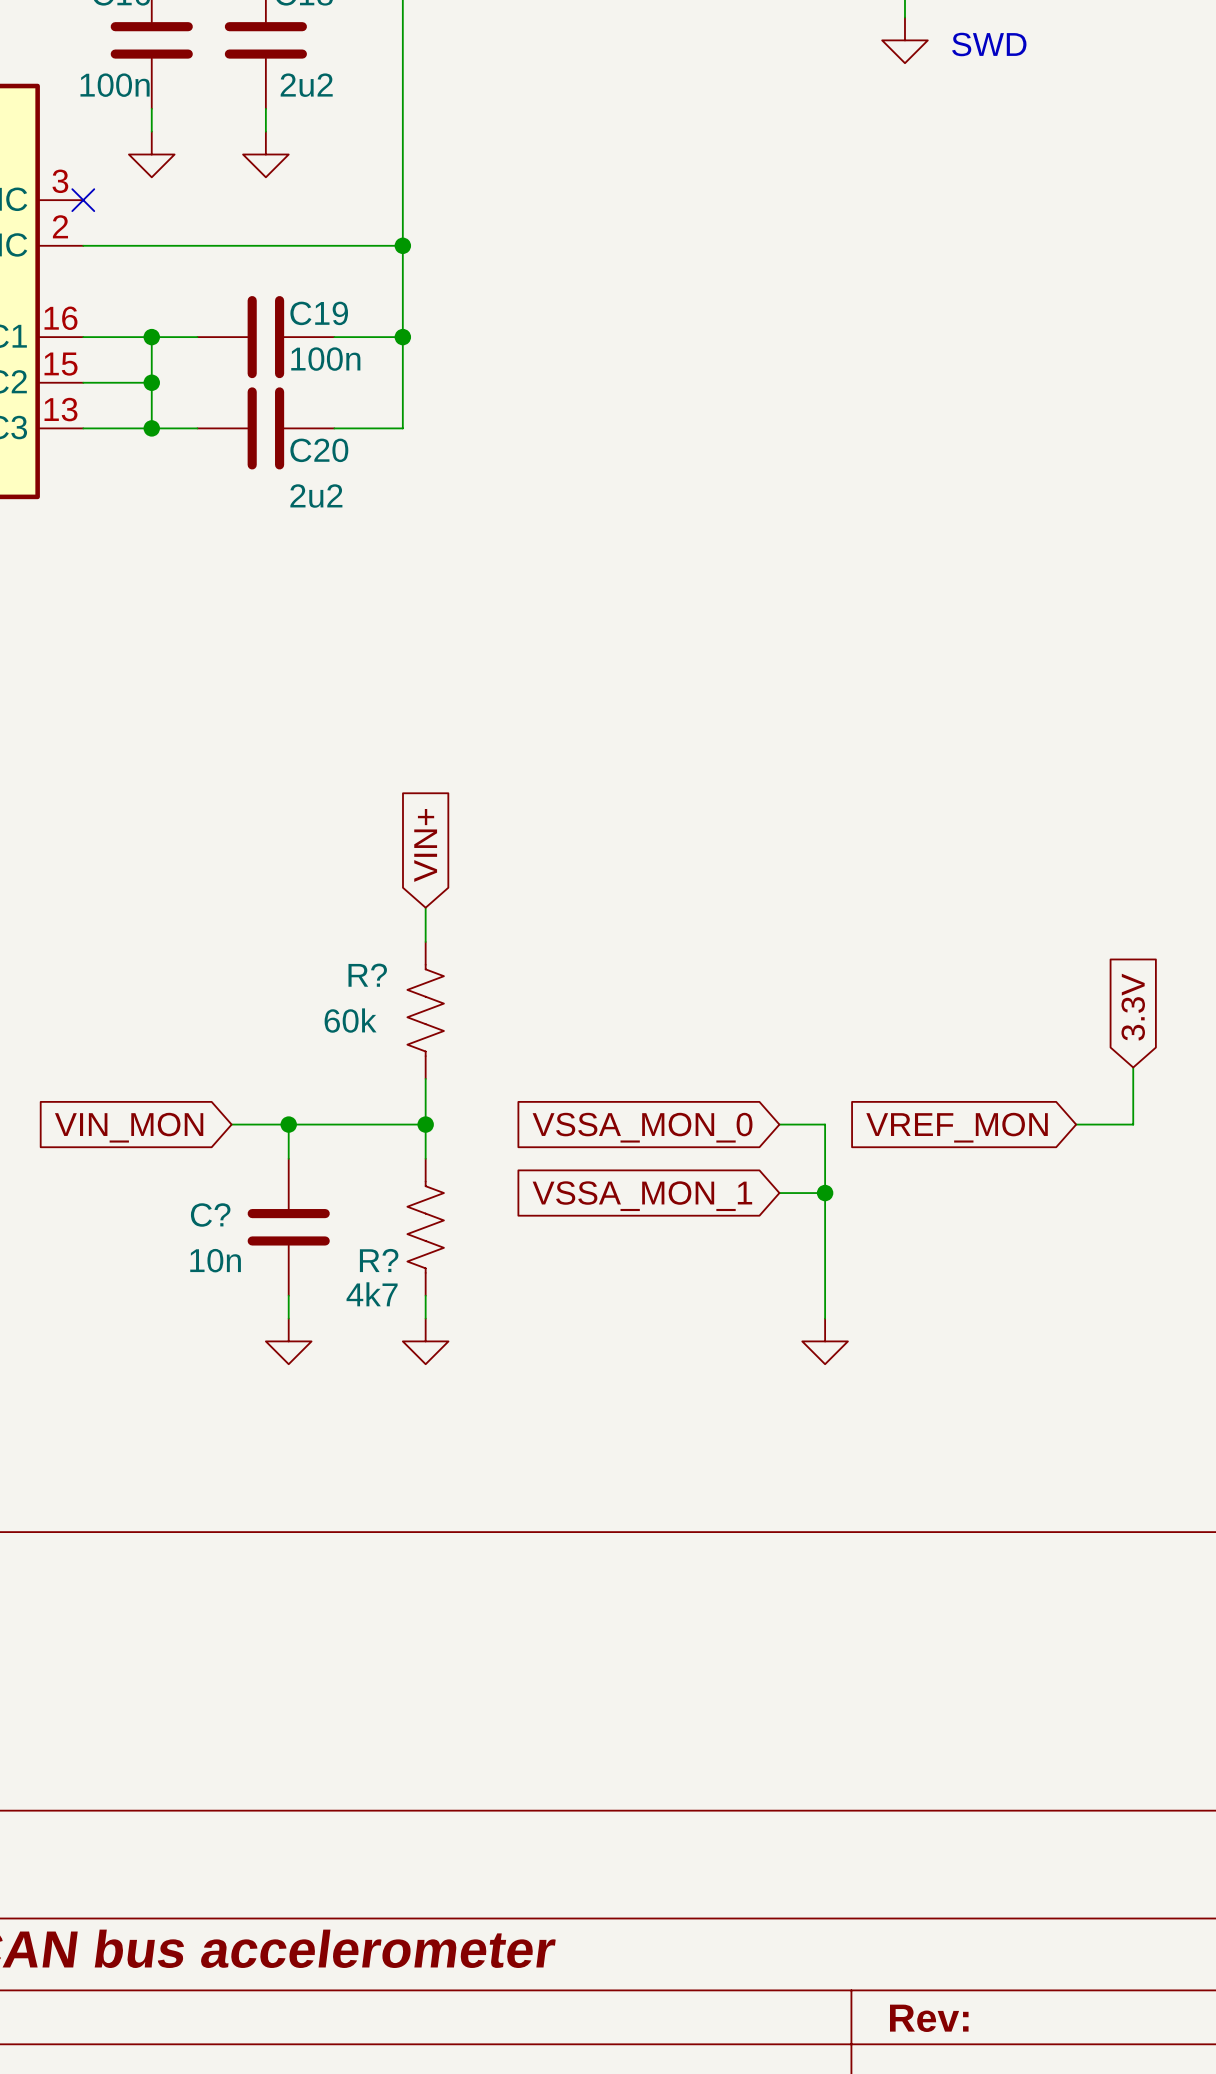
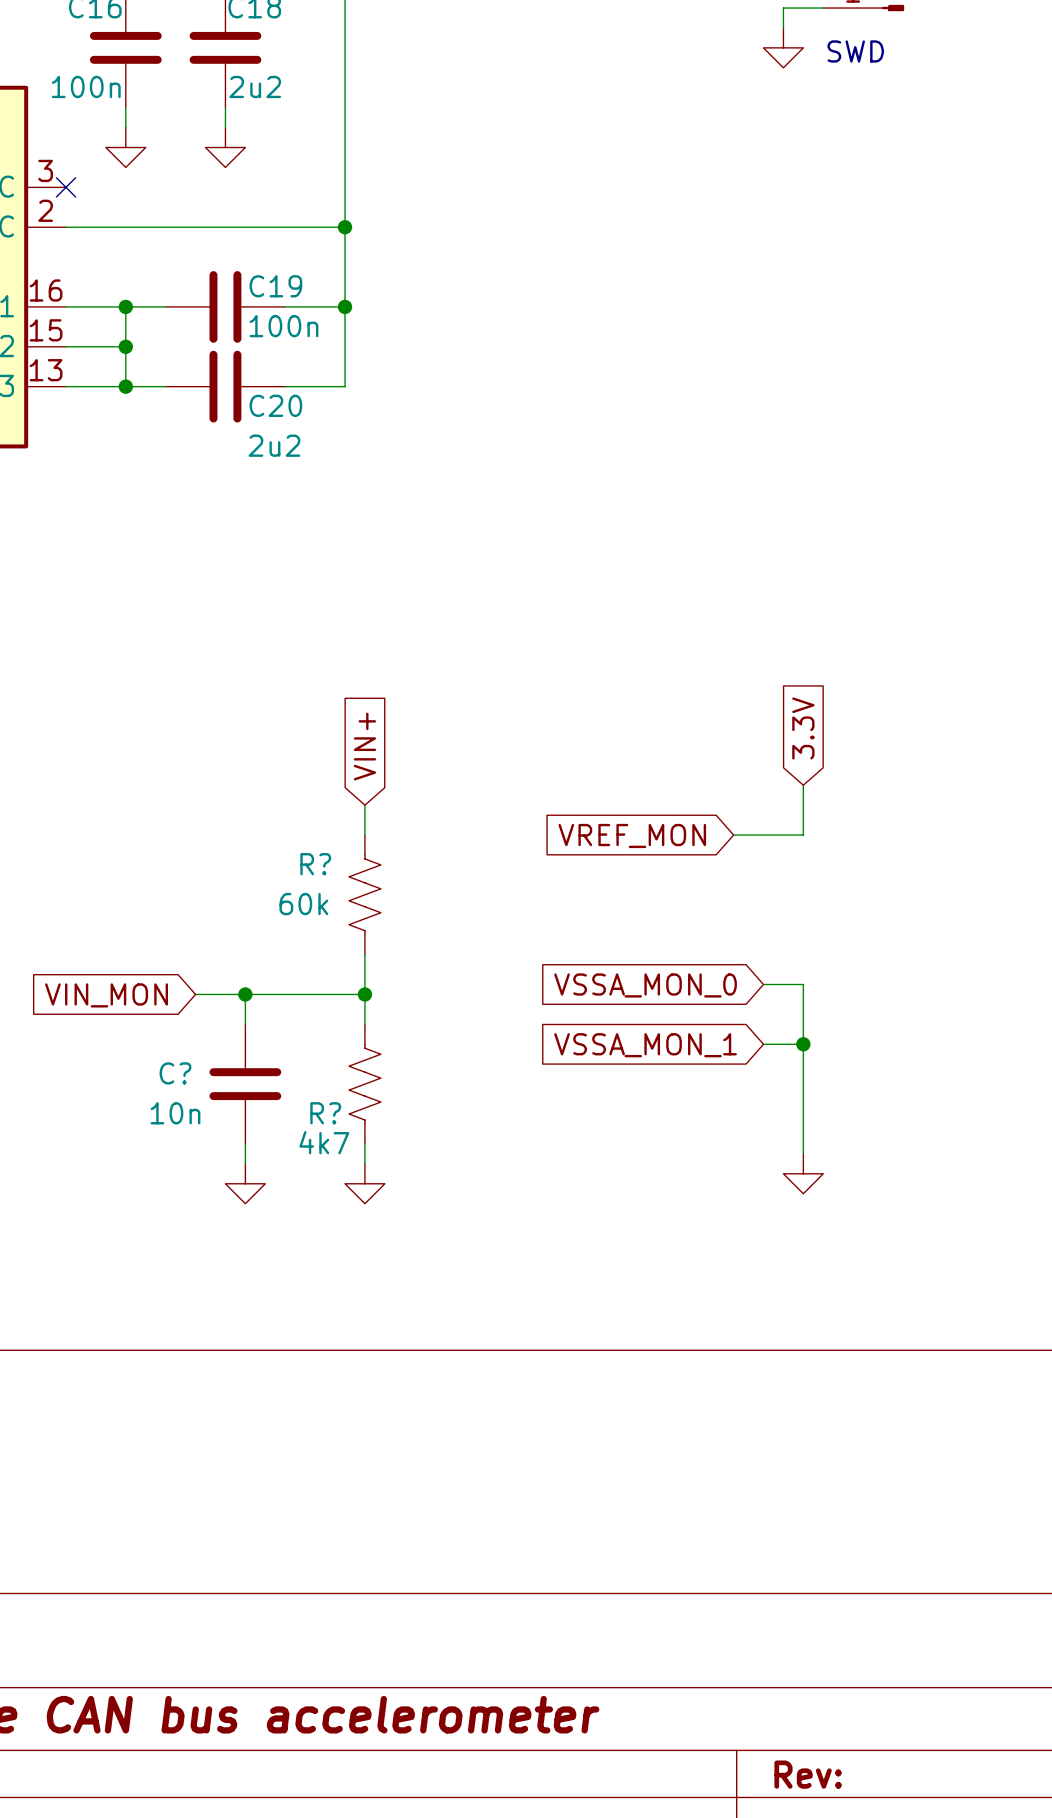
wire: none -> (803, 785) (803, 835) (733, 835)
global label position: 3.3V (1133, 1007) -> 3.3V (803, 728)
wire: (1133, 1067) (1133, 1124) (1076, 1124) -> none
wire: (779, 1124) (825, 1124) (825, 1318) -> (763, 984) (803, 984) (803, 1153)
global label position: VSSA_MON_0 (642, 1127) -> VSSA_MON_0 (645, 985)
global label position: VREF_MON (957, 1127) -> VREF_MON (632, 835)
wire: (779, 1193) (825, 1193) -> (763, 1044) (803, 1044)
junction position: (825, 1193) -> (803, 1044)
global label position: VSSA_MON_1 (642, 1196) -> VSSA_MON_1 (645, 1045)
power symbol position: (825, 1341) -> (803, 1173)

